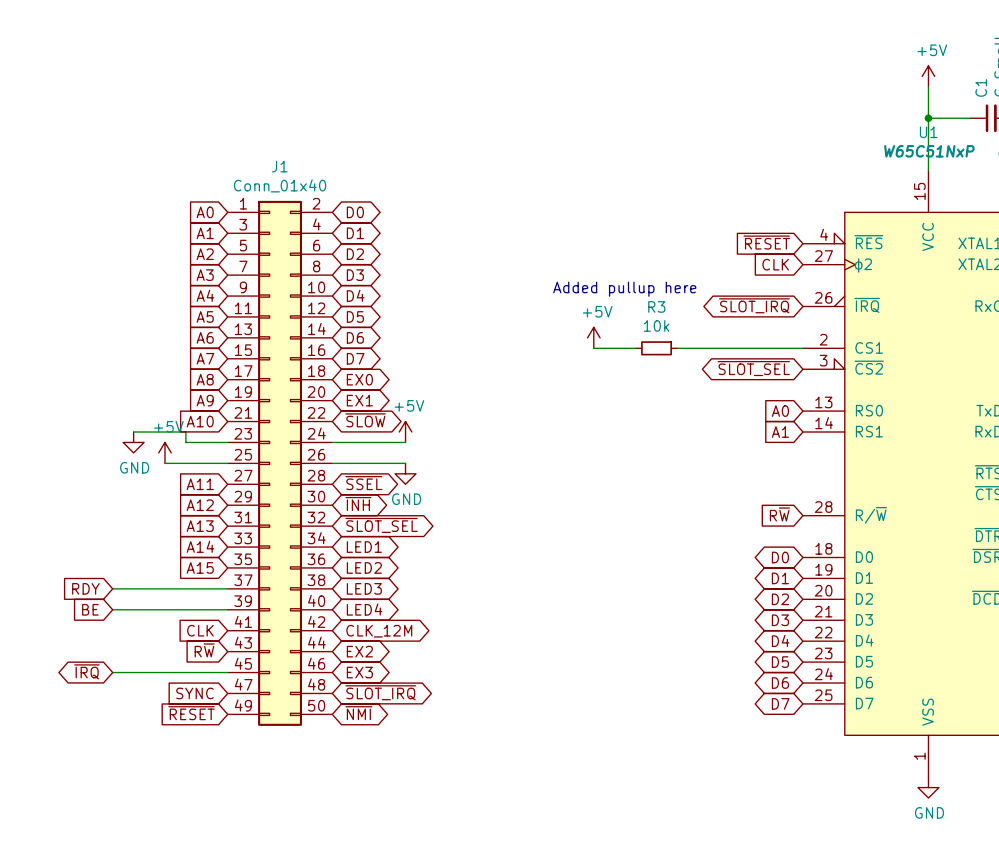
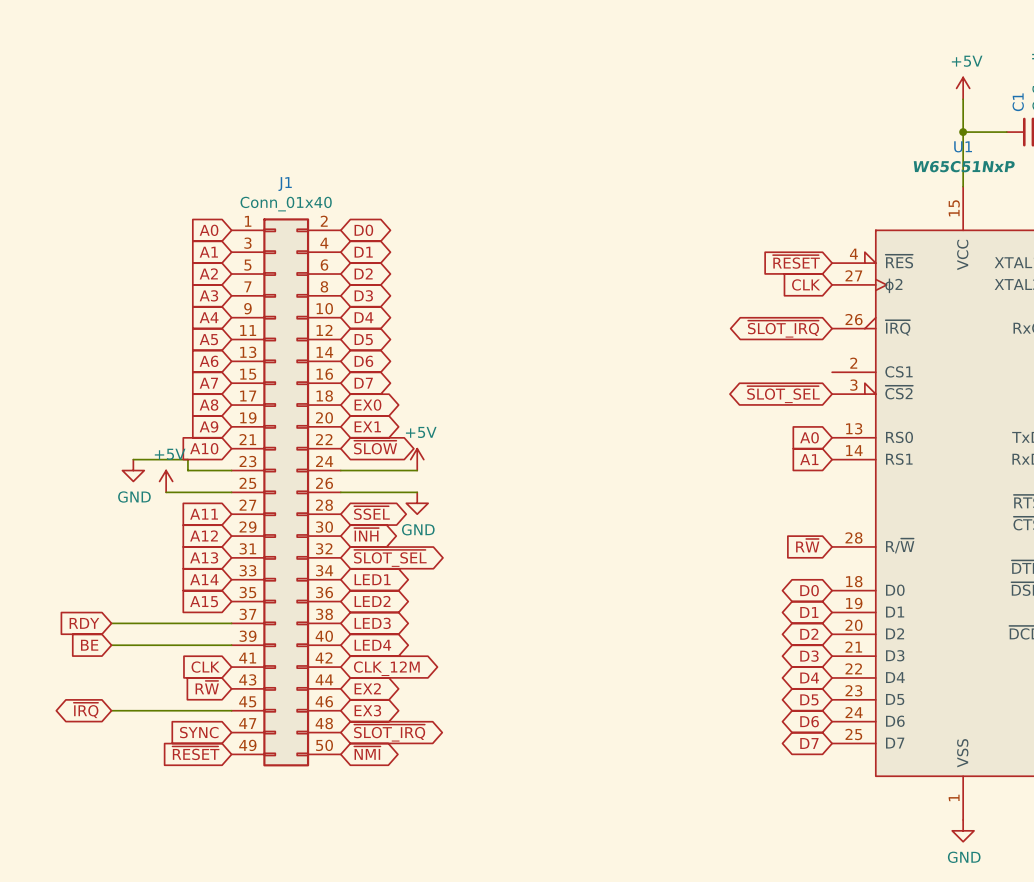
text: Added pullup here (624, 289) -> none
power symbol: +5V (593, 337) -> none
wire: (593, 348) (635, 348) -> none
R3: 10k (656, 348) -> none
wire: (677, 348) (802, 348) -> none

